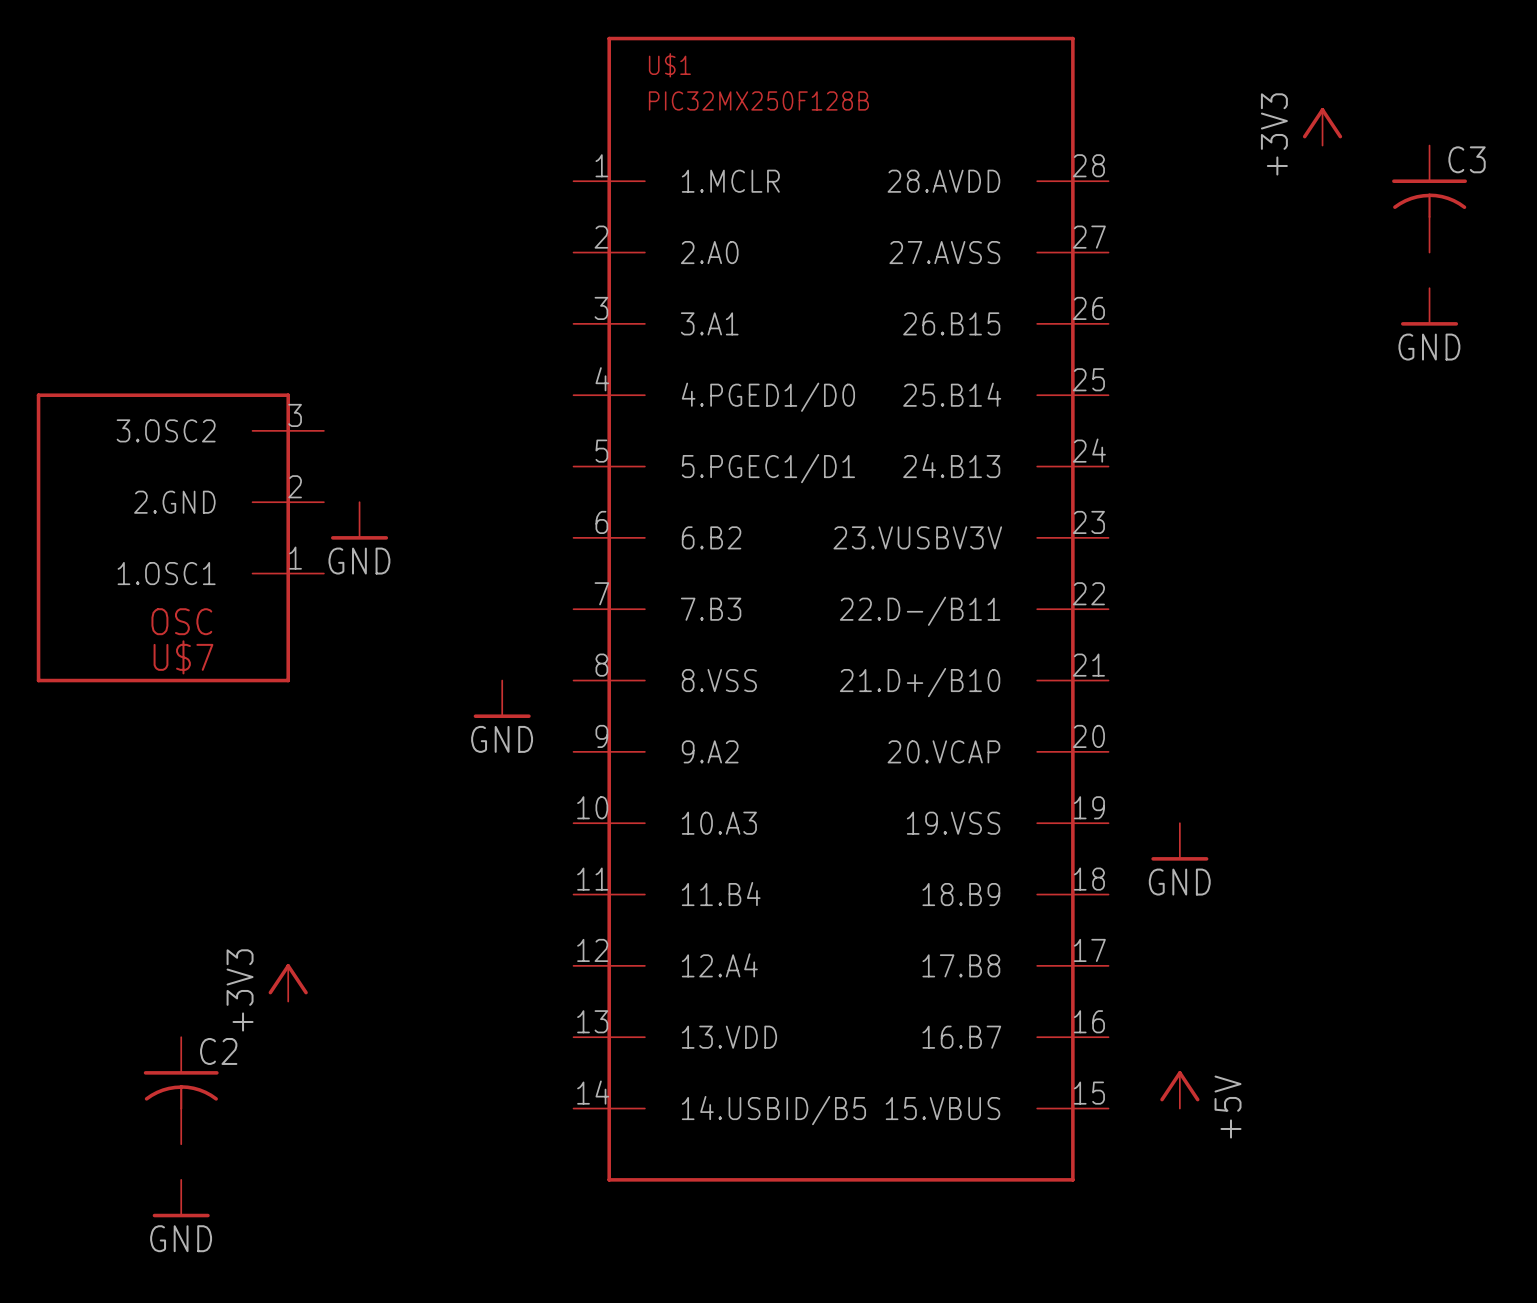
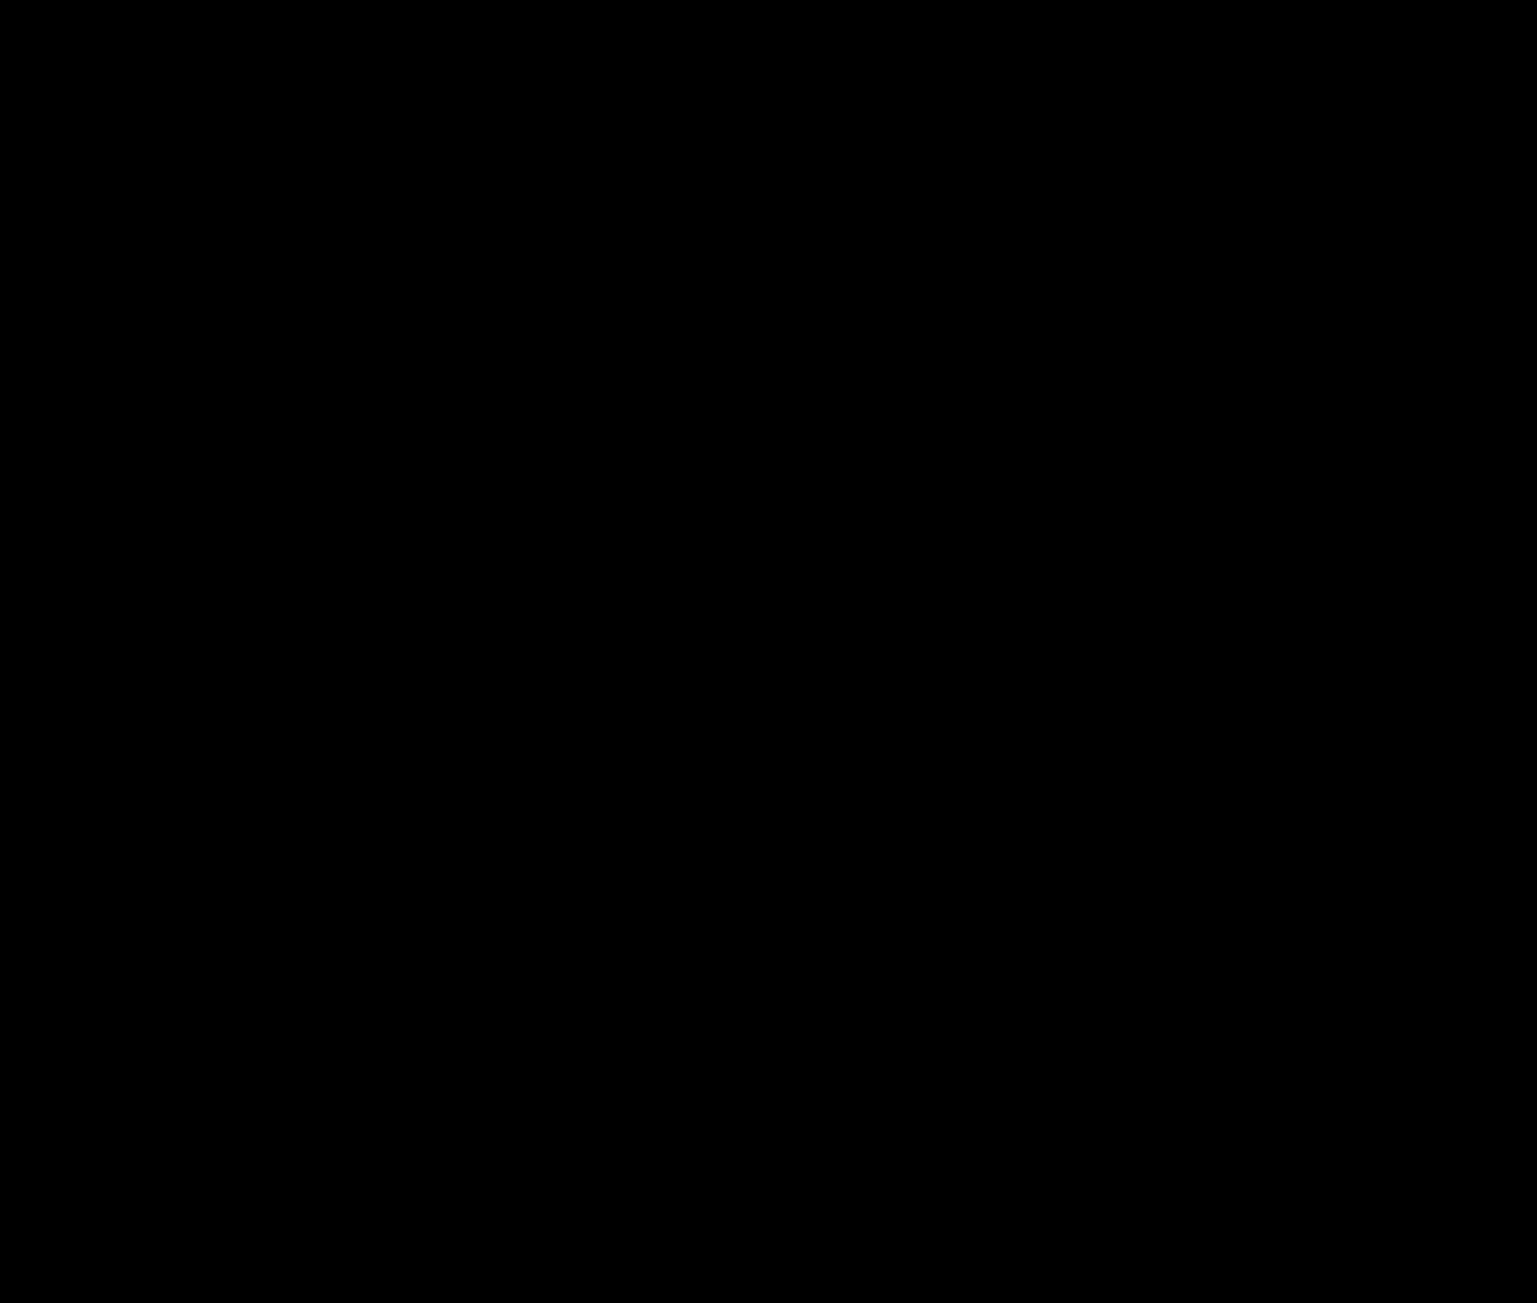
power symbol: +3V3 (1322, 126) -> none
C3: (1429, 199) -> none
power symbol: GND (1429, 306) -> none
power symbol: GND (359, 520) -> none
U$7: OSC (180, 537) -> none
U$1: PIC32MX250F128B (841, 609) -> none
power symbol: GND (502, 699) -> none
power symbol: GND (1179, 841) -> none
power symbol: +3V3 (288, 982) -> none
power symbol: +5V (1179, 1089) -> none
C2: (181, 1090) -> none
power symbol: GND (181, 1198) -> none

